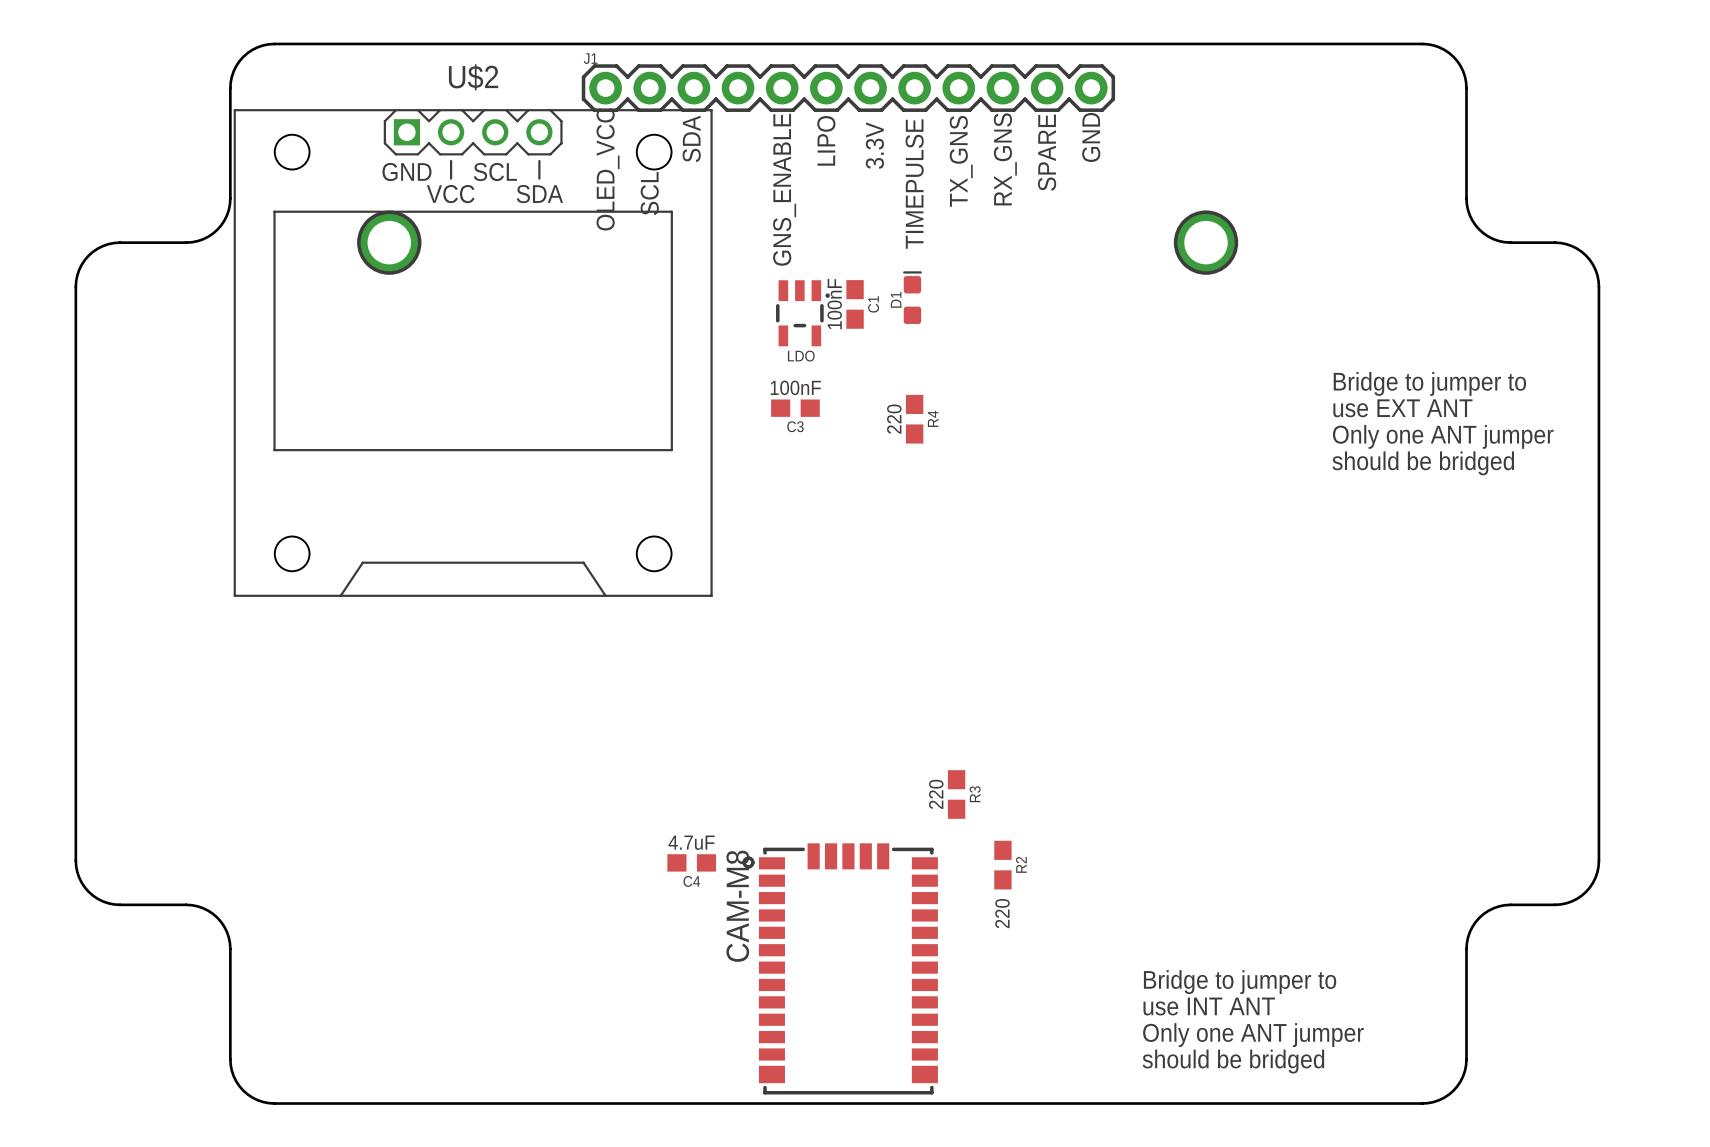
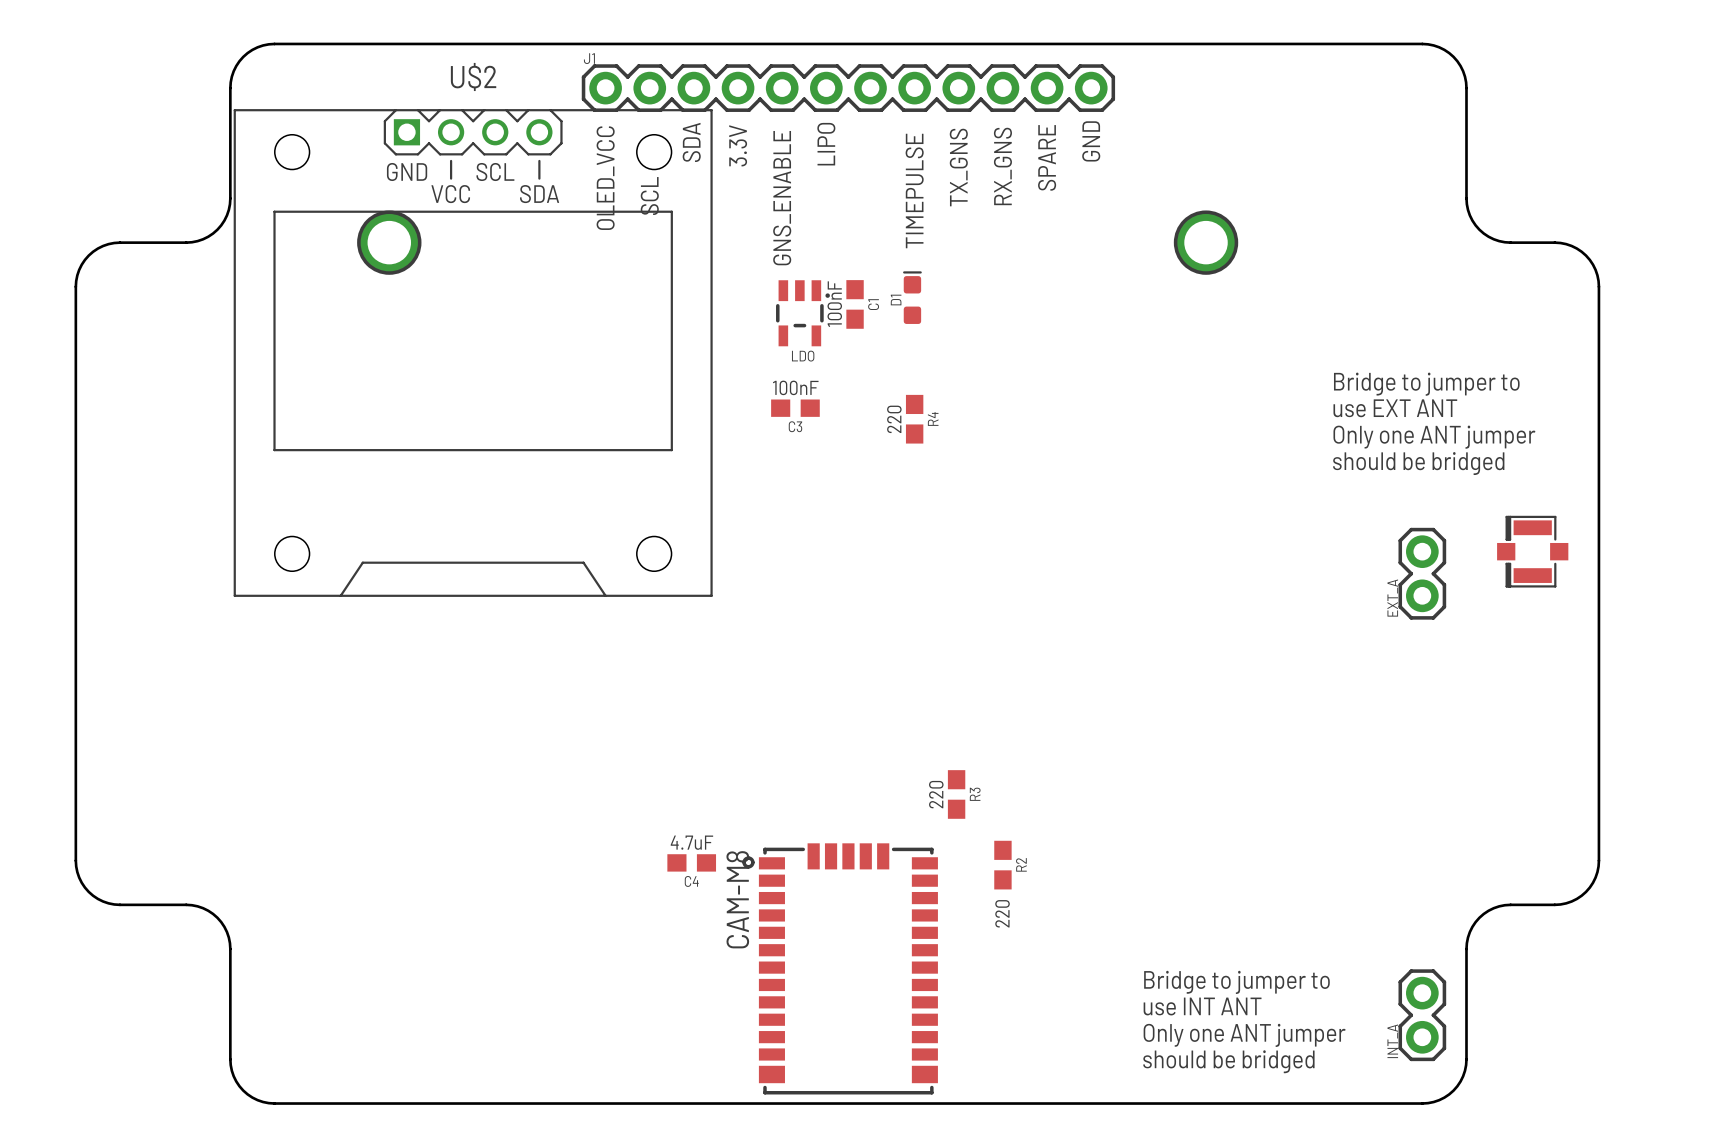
text position: 3.3V (874, 145) -> 3.3V (738, 145)
part: none -> (1532, 551)
EXT_A: none -> (1422, 573)
INT_A: none -> (1422, 1015)

